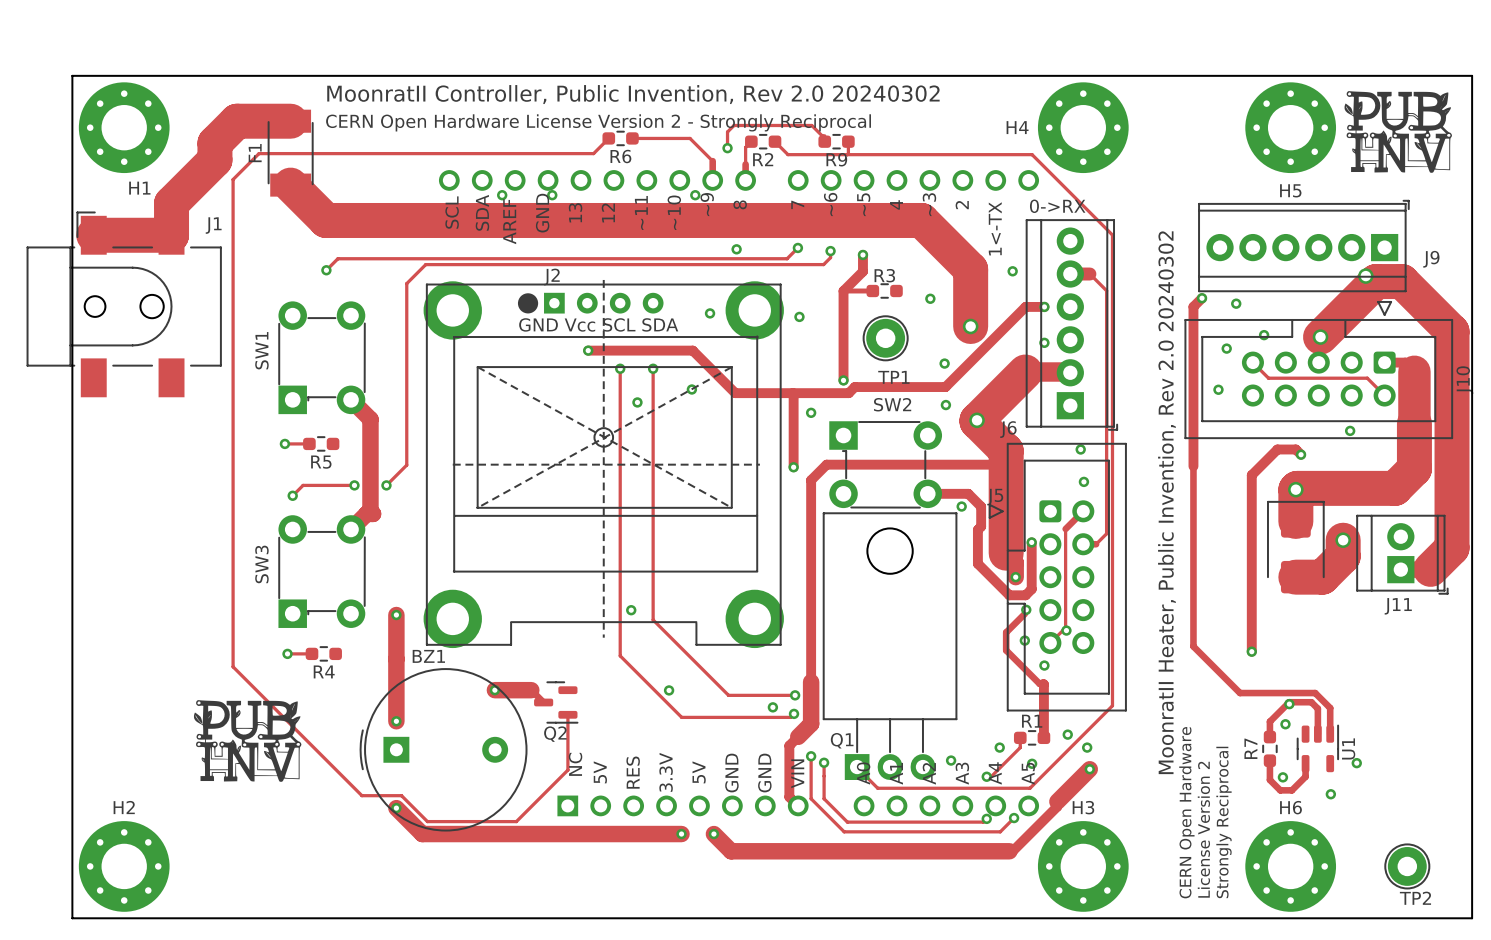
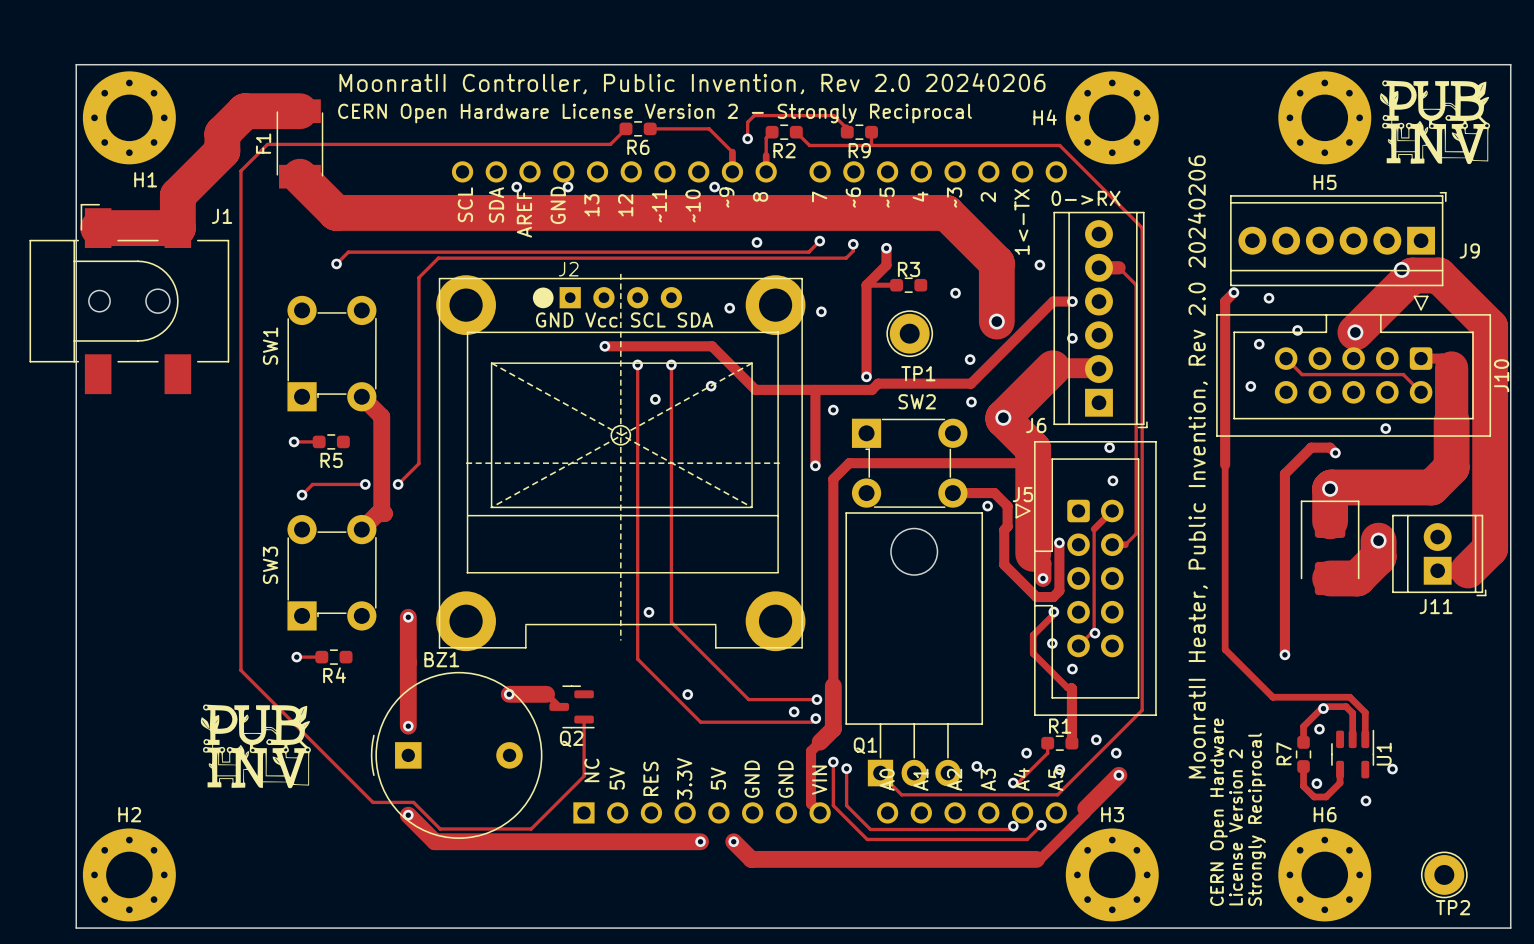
text: MoonratII Controller, Public Invention, Rev 2.0 20240302 (633, 94) -> MoonratII Controller, Public Invention, Rev 2.0 20240206 (692, 83)
text: MoonratII Heater, Public Invention, Rev 2.0 20240302 (1166, 502) -> MoonratII Heater, Public Invention, Rev 2.0 20240206 (1197, 466)

